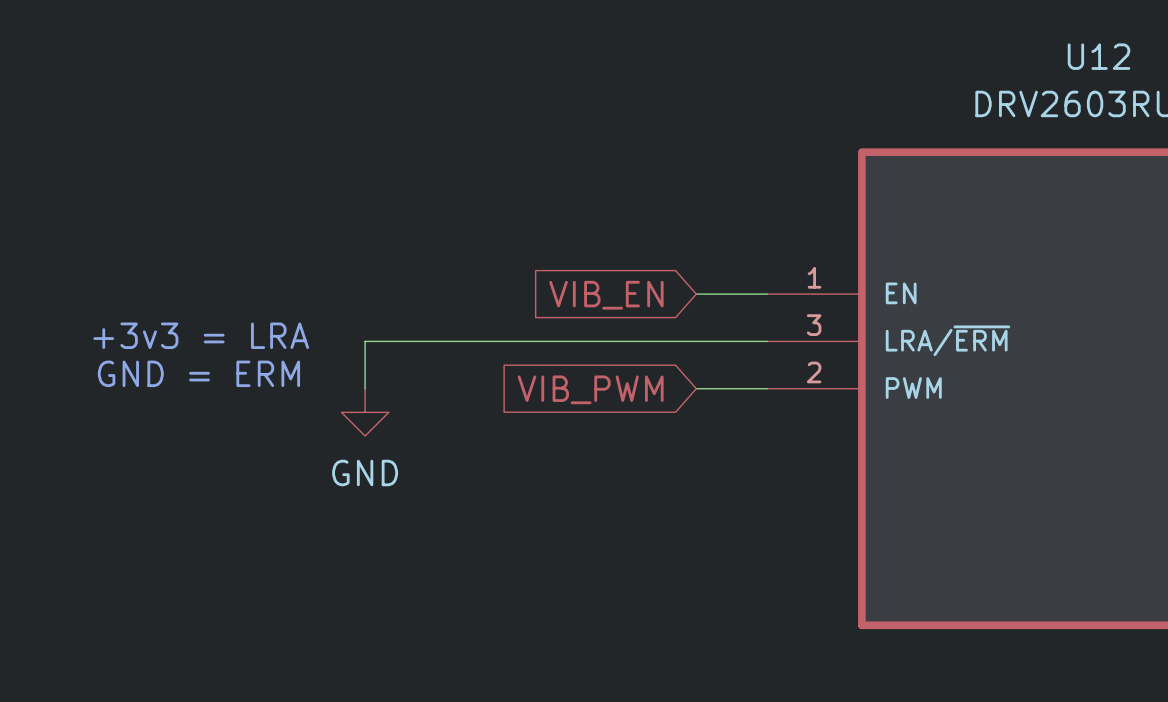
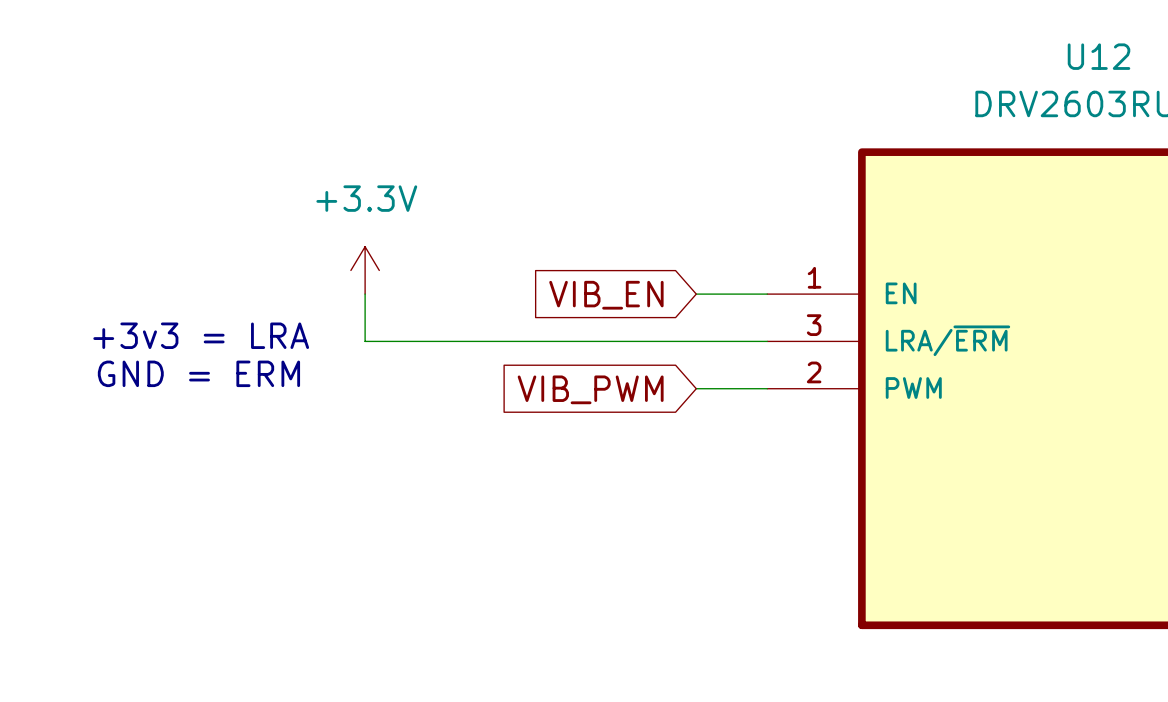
power symbol: none -> +3.3V (365, 270)
wire: (365, 341) (365, 388) -> (365, 341) (365, 294)
power symbol: GND (365, 412) -> none

